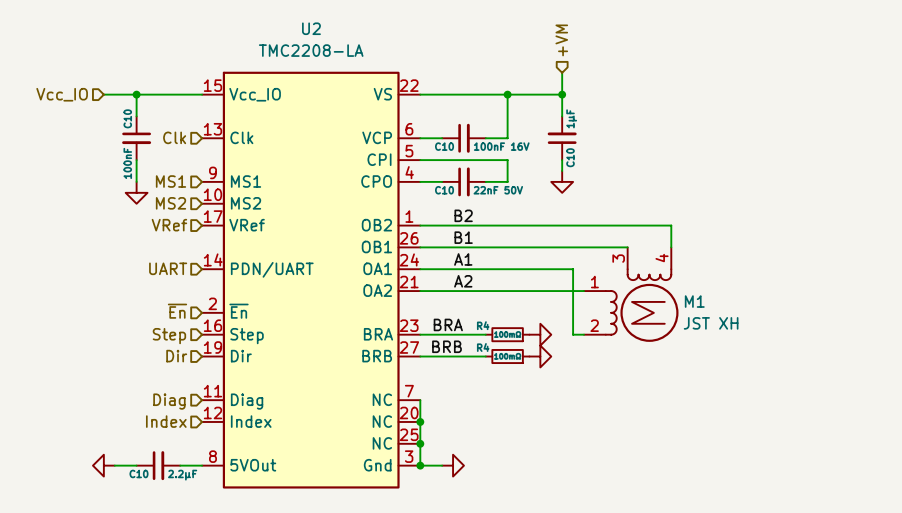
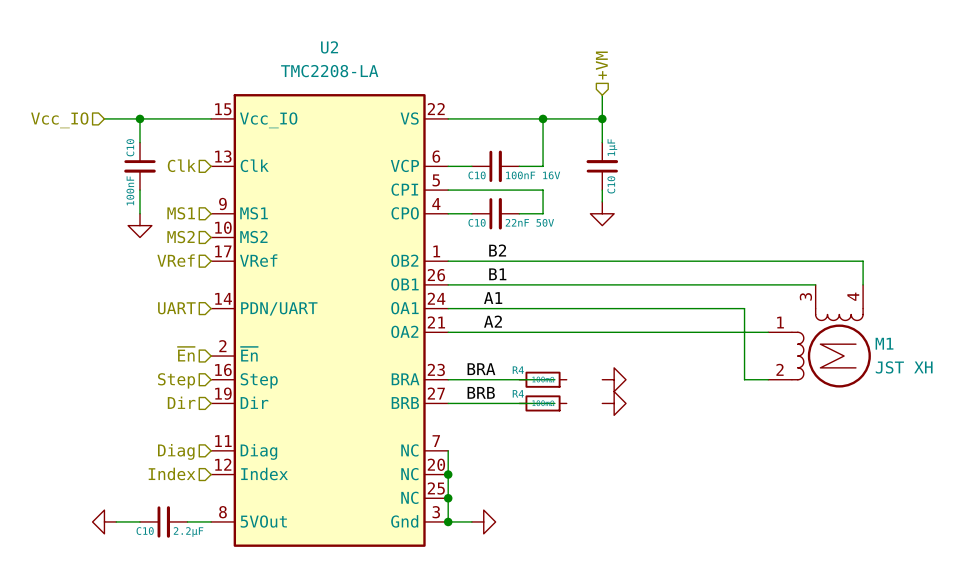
wire: (671, 225) (671, 247) -> (720, 261) (863, 261) (863, 284)
wire: none -> (673, 284) (815, 284)
wire: (573, 269) (573, 334) (583, 334) -> (614, 308) (744, 308) (744, 379) (768, 379)
wire: none -> (626, 332) (768, 332)
M1 position: (631, 294) -> (819, 336)
wire: none -> (519, 379) (554, 379)
power symbol: (540, 334) -> none
power symbol: none -> (614, 379)
wire: none -> (519, 403) (554, 403)
power symbol: (540, 356) -> none
power symbol: none -> (614, 403)

